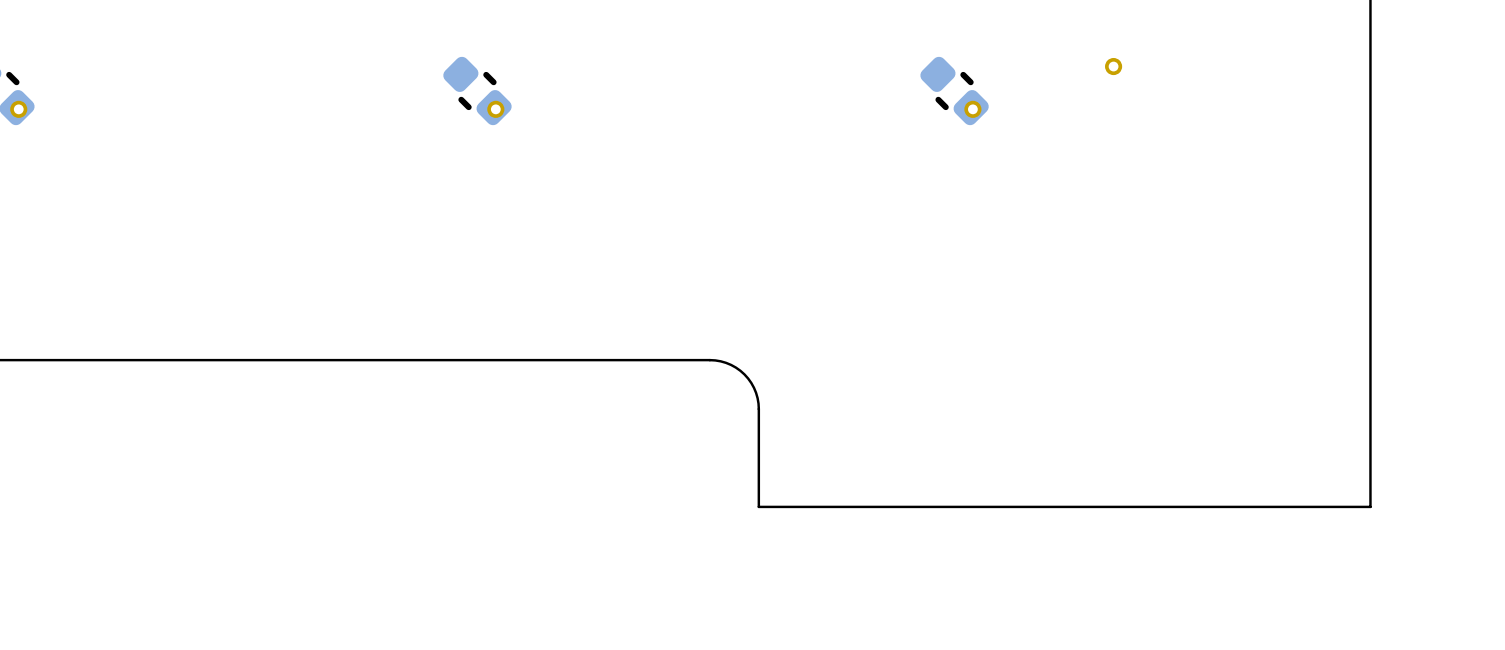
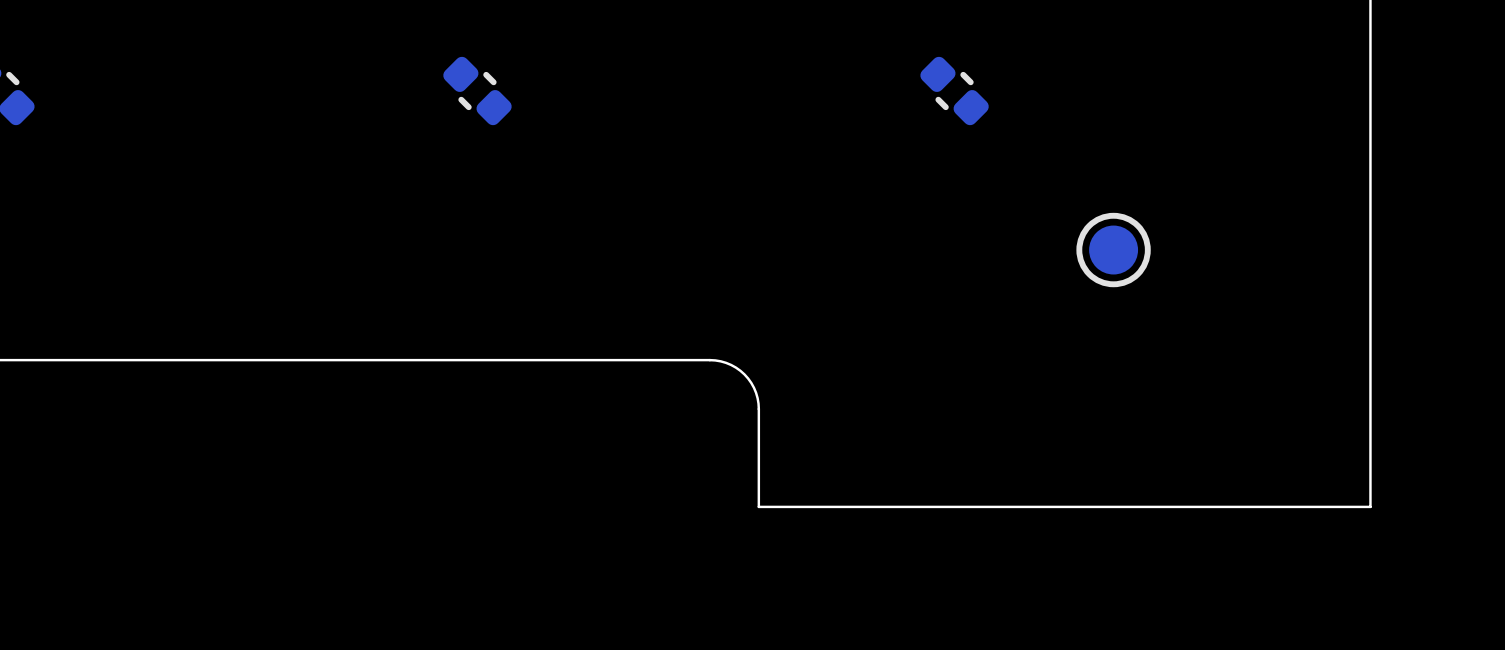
part: (1113, 66) -> none
part: (18, 109) -> none
part: (495, 109) -> none
part: (972, 109) -> none
part: none -> (1113, 250)

